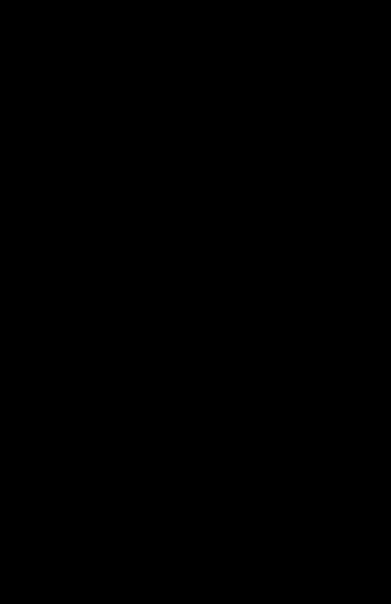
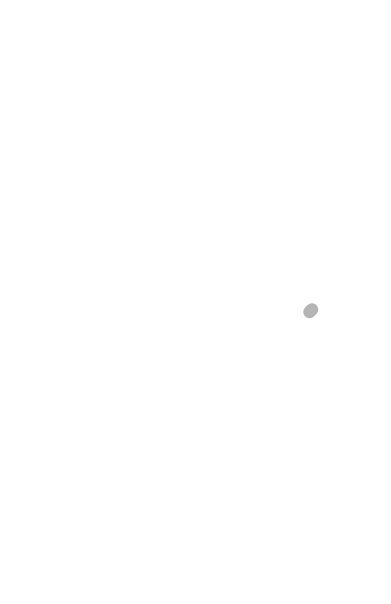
track: none -> (311, 309) (309, 311)

